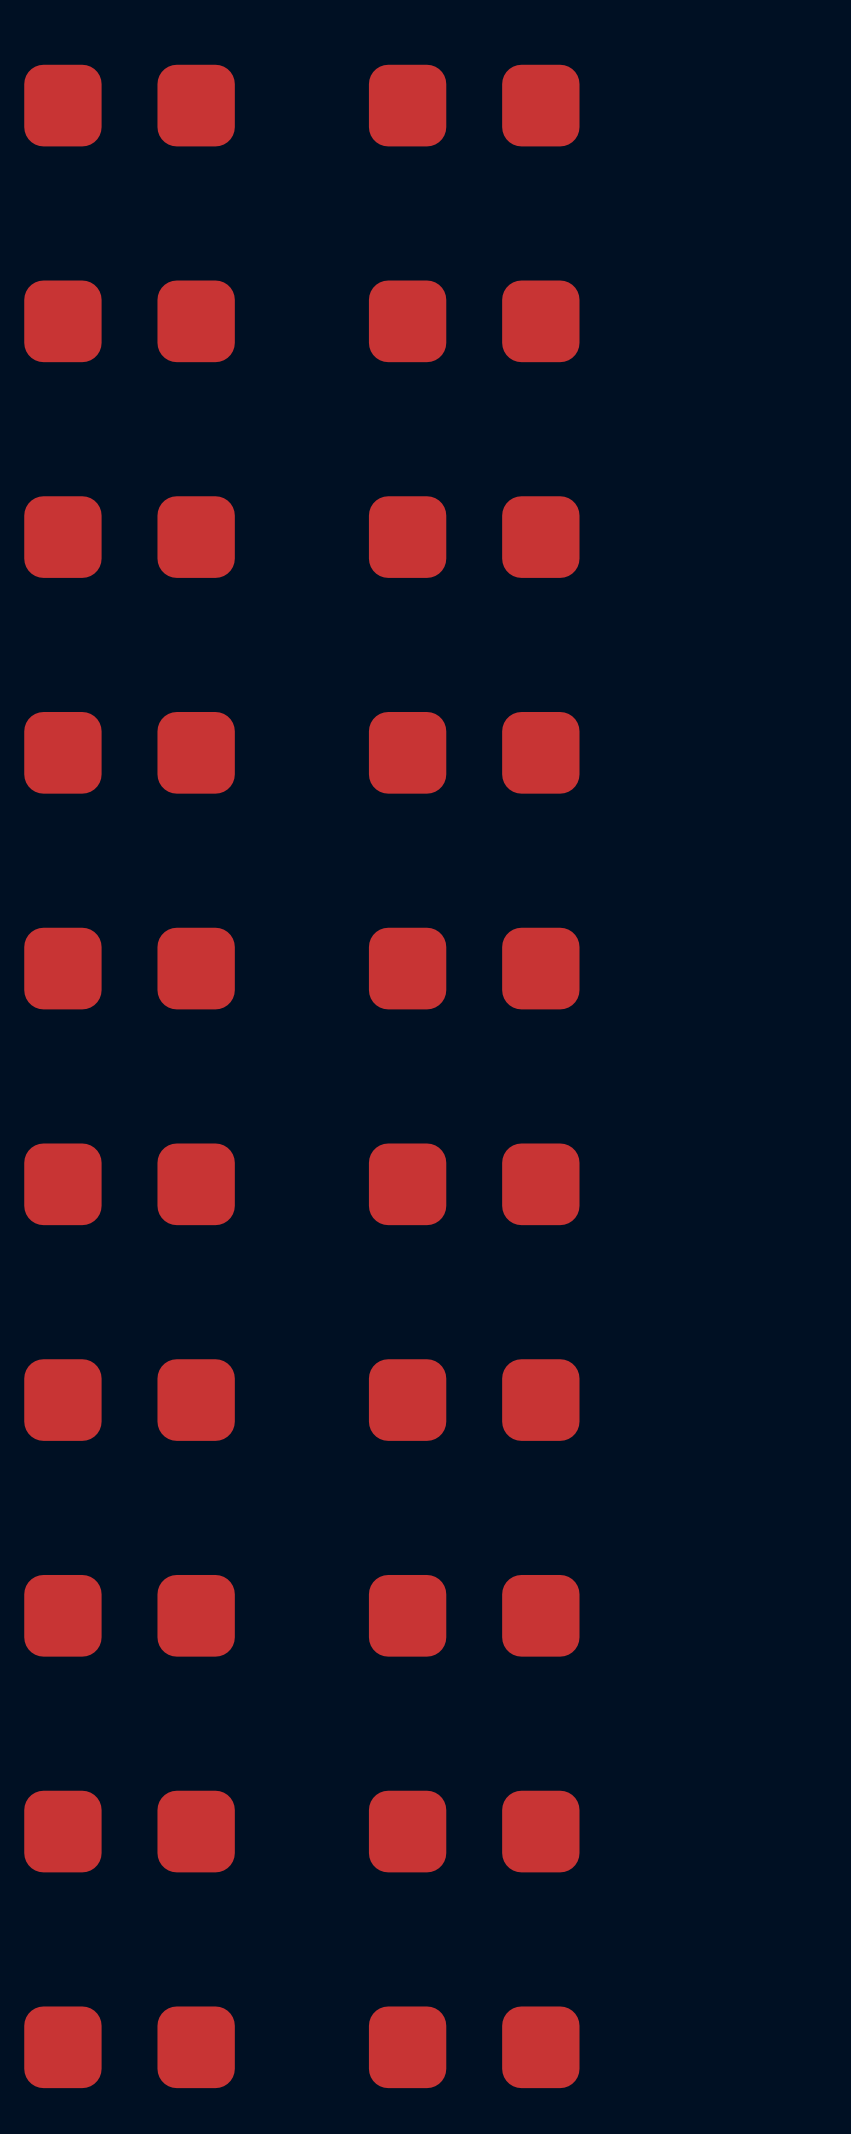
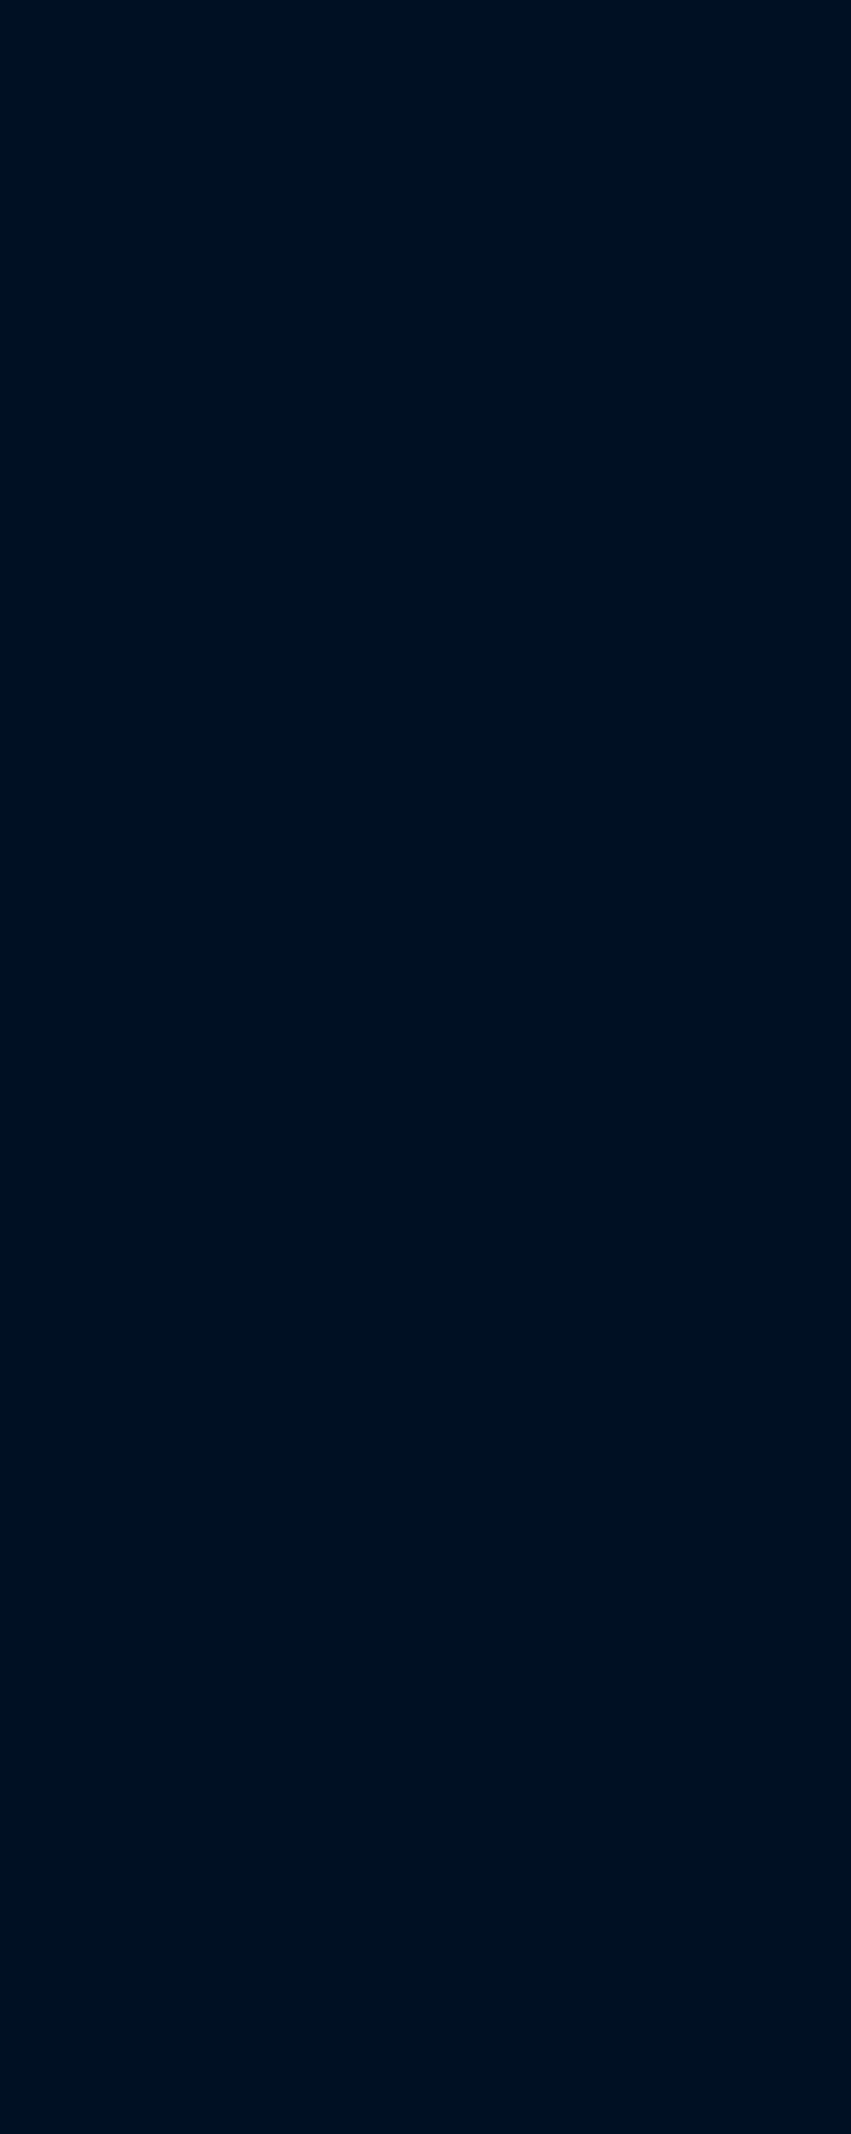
part: (129, 105) -> none
part: (474, 105) -> none
part: (129, 321) -> none
part: (474, 321) -> none
part: (129, 537) -> none
part: (474, 537) -> none
part: (129, 752) -> none
part: (474, 752) -> none
part: (129, 968) -> none
part: (474, 968) -> none
part: (129, 1184) -> none
part: (474, 1184) -> none
part: (129, 1400) -> none
part: (474, 1400) -> none
part: (129, 1615) -> none
part: (474, 1615) -> none
part: (129, 1831) -> none
part: (474, 1831) -> none
part: (129, 2047) -> none
part: (474, 2047) -> none

